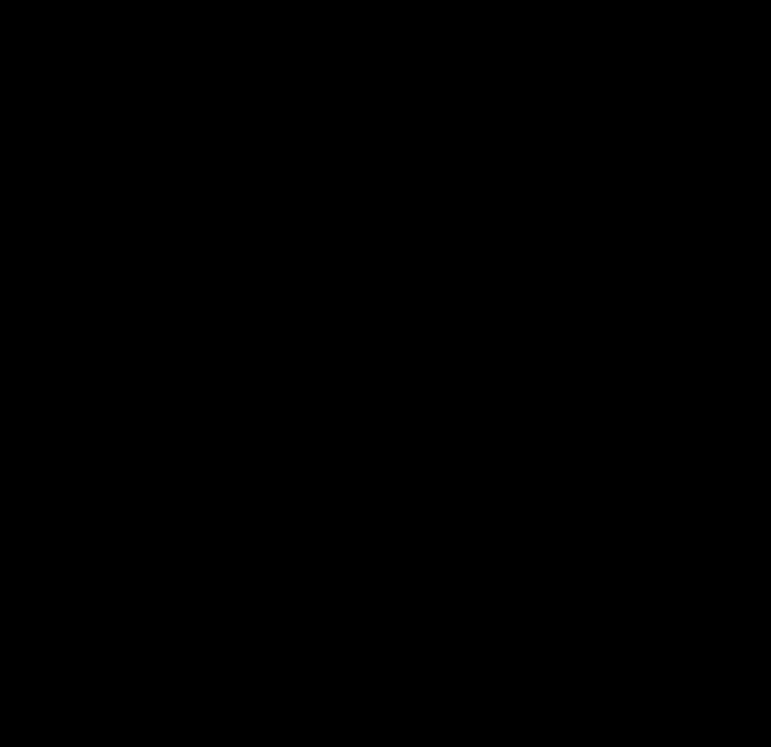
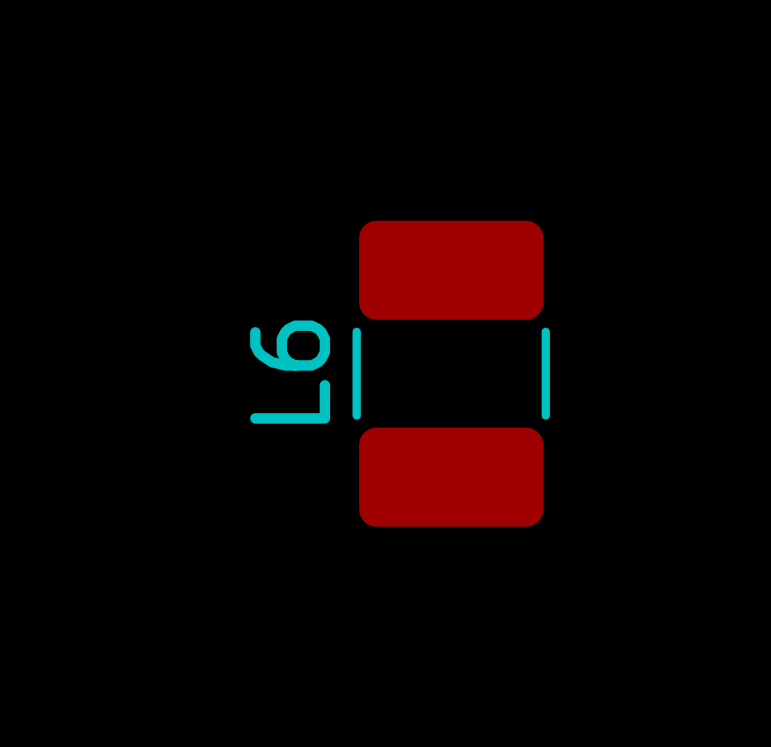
L6: none -> (451, 373)

